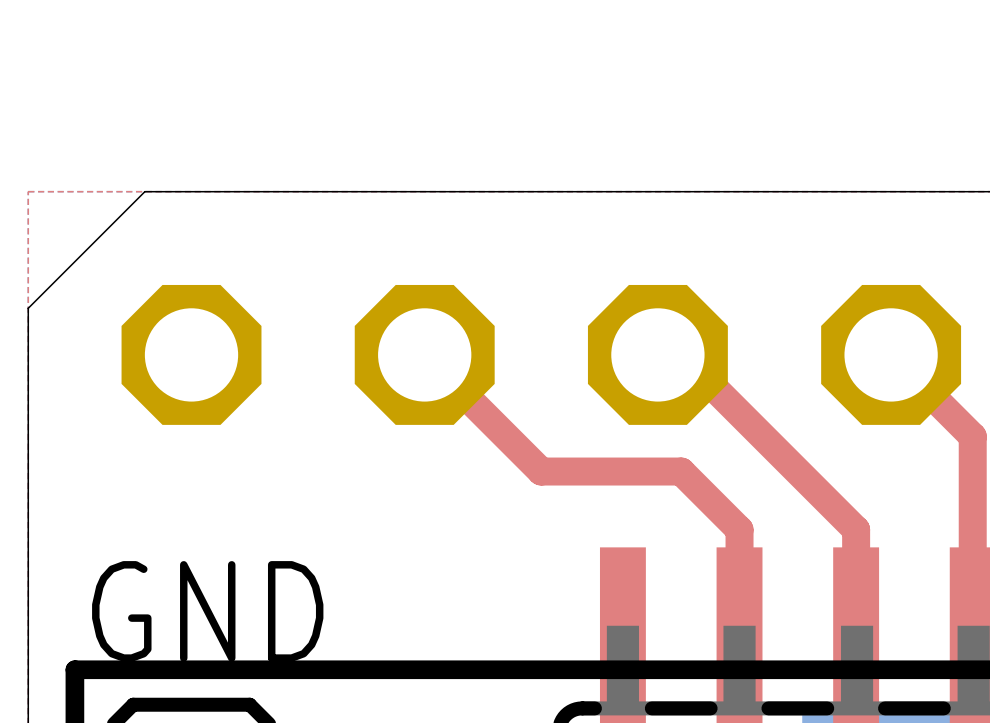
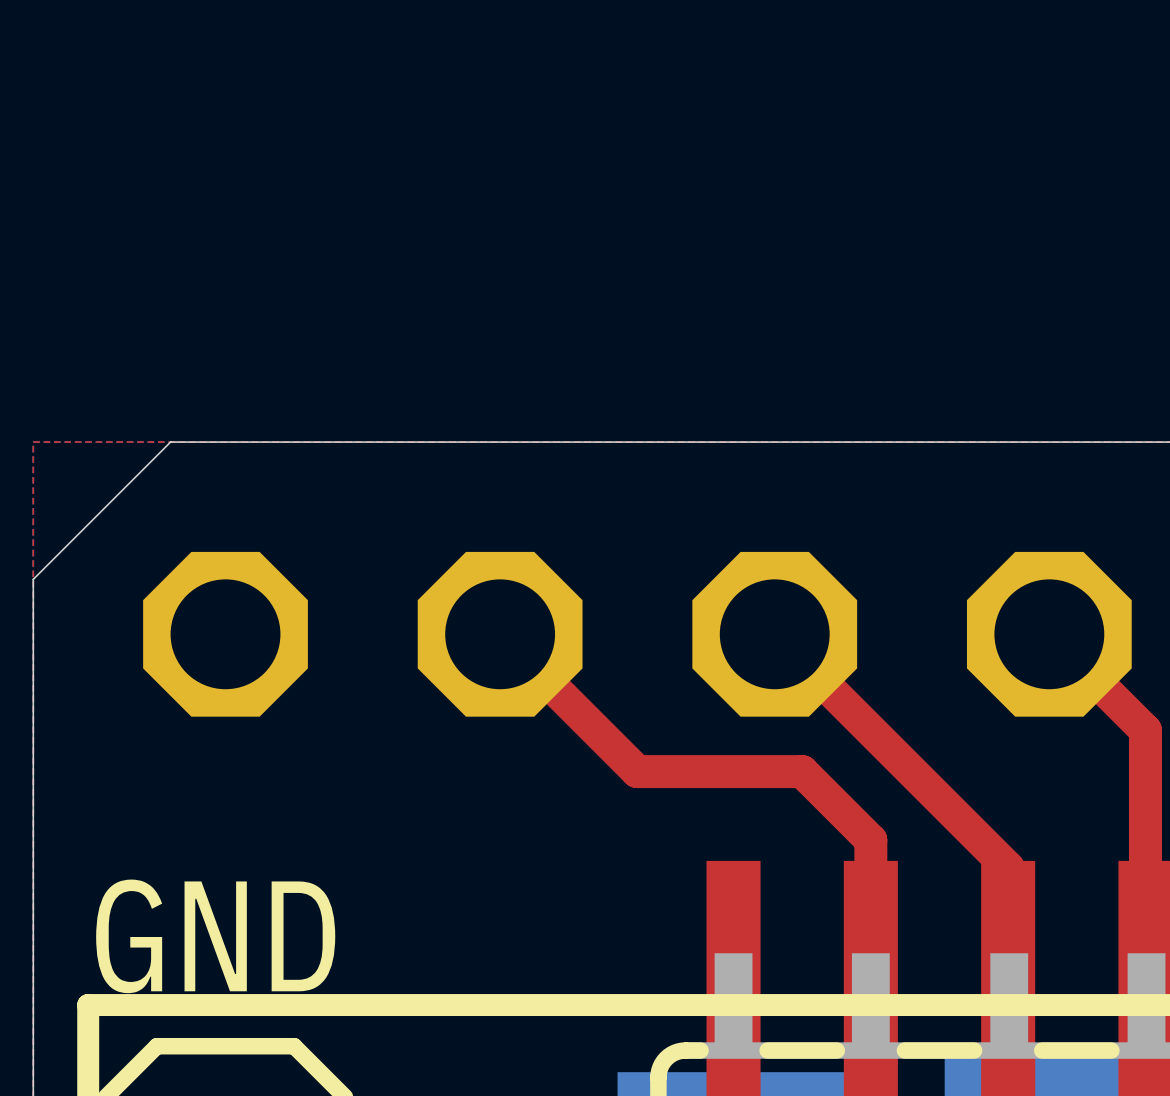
top track: (657, 354) (681, 354) (856, 529) (856, 553) -> (774, 634) (1008, 867)

